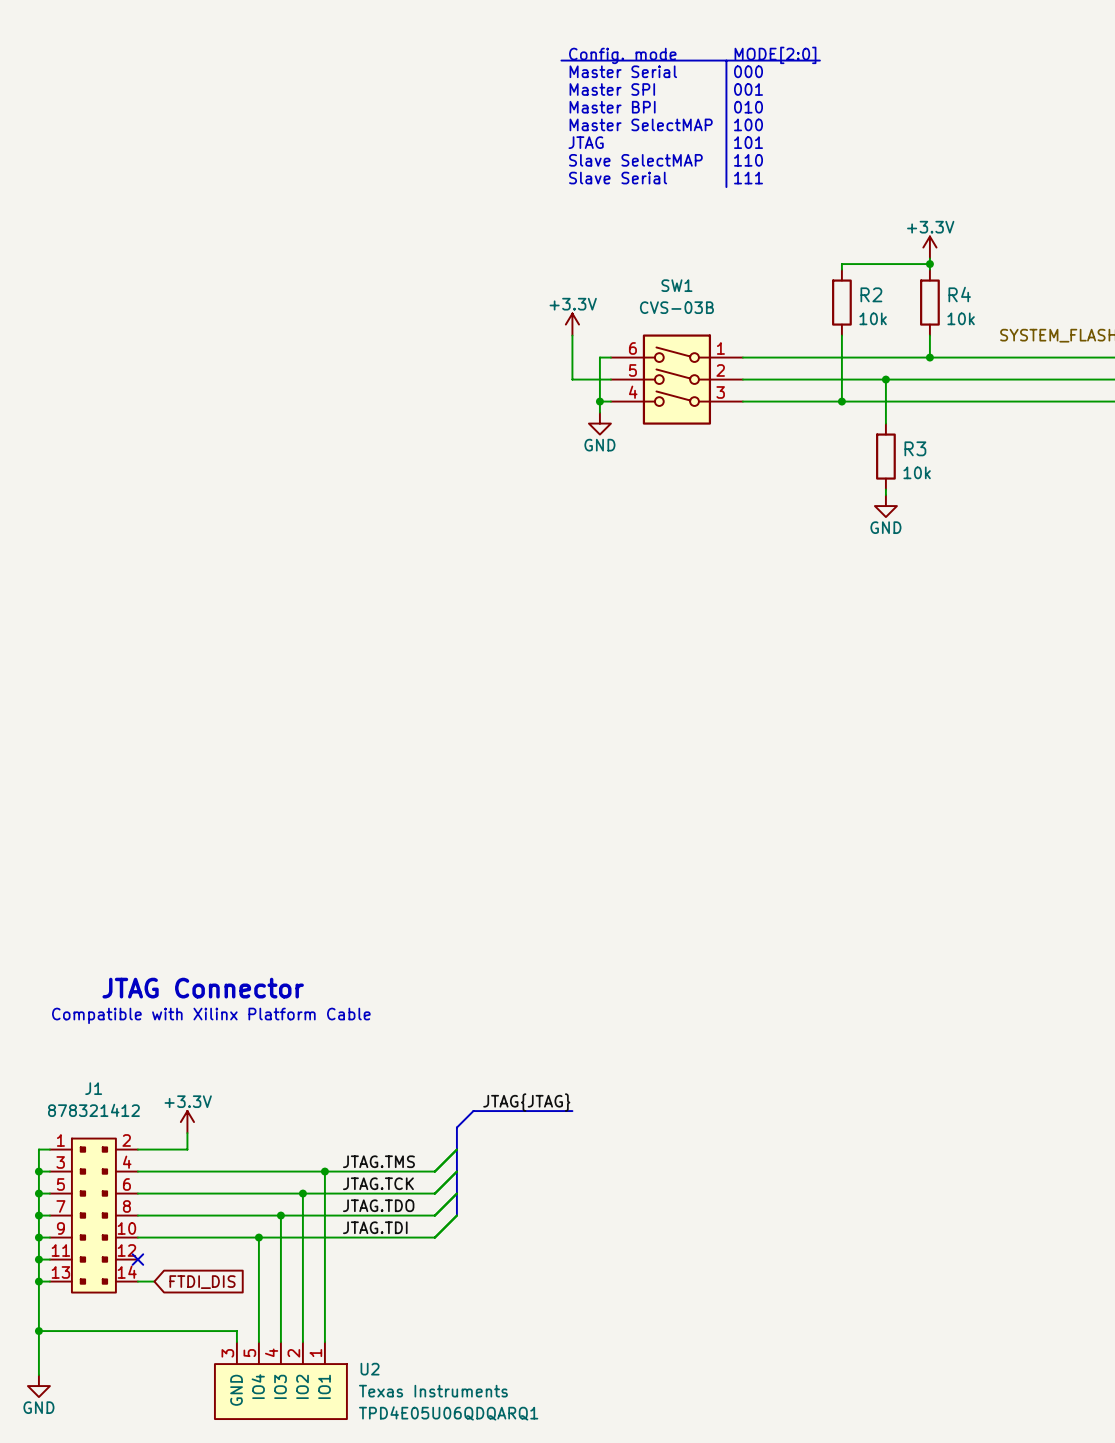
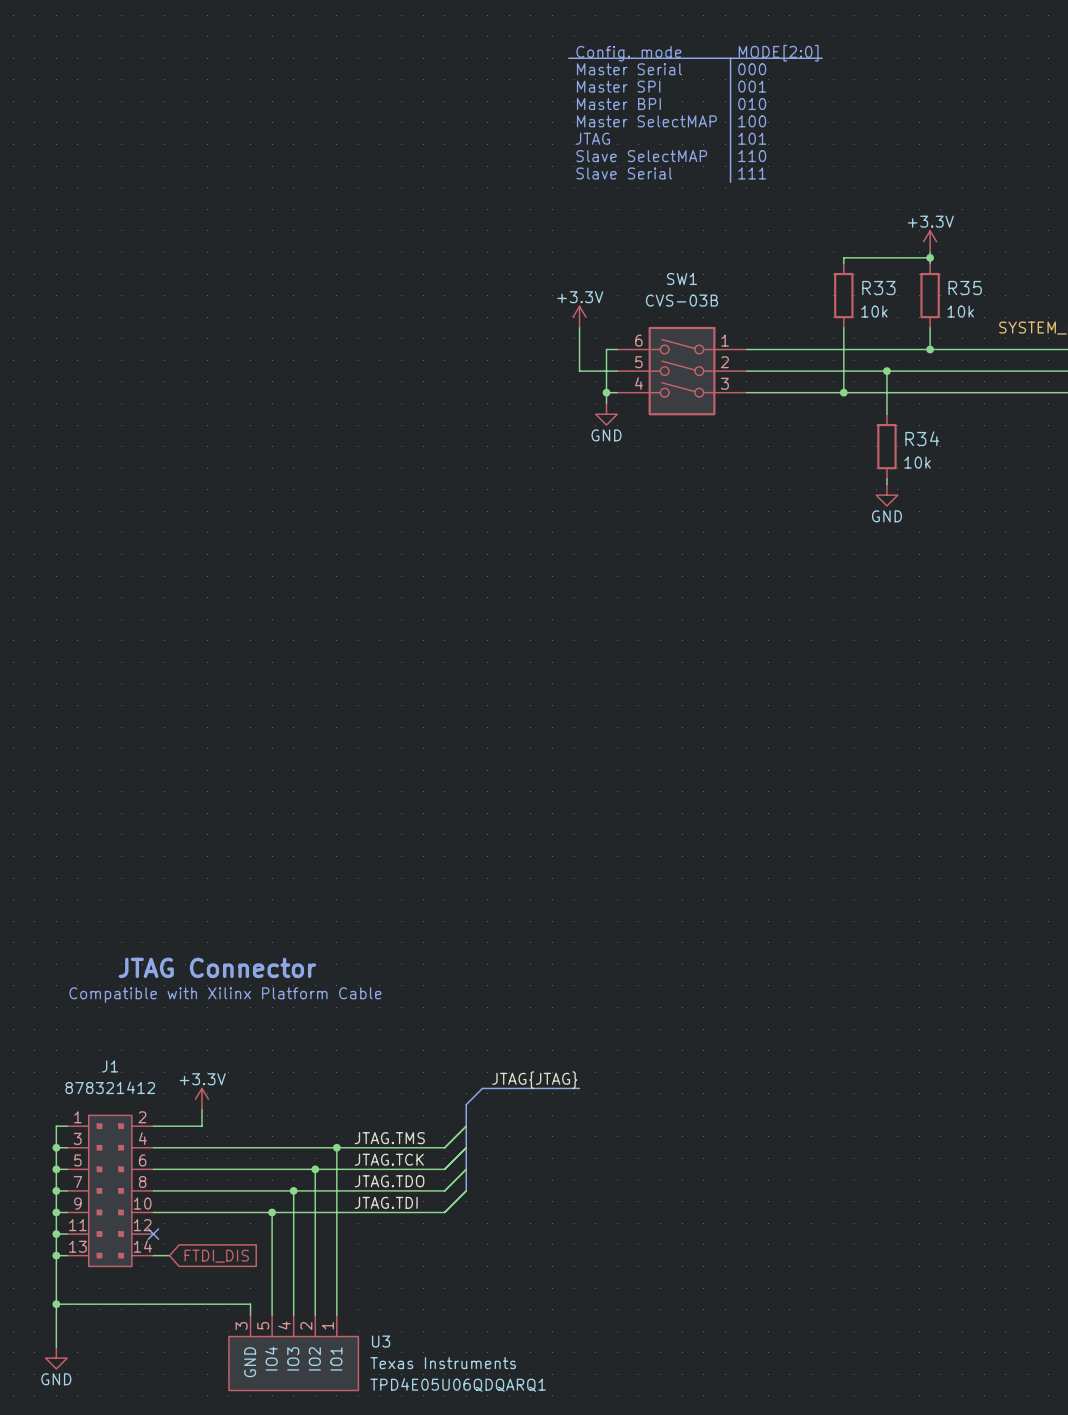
R2 name: R2 (871, 294) -> R33 (878, 288)
R4 name: R4 (959, 294) -> R35 (965, 288)
R3 name: R3 (915, 448) -> R34 (922, 438)
U2 name: U2 (370, 1369) -> U3 (381, 1341)

